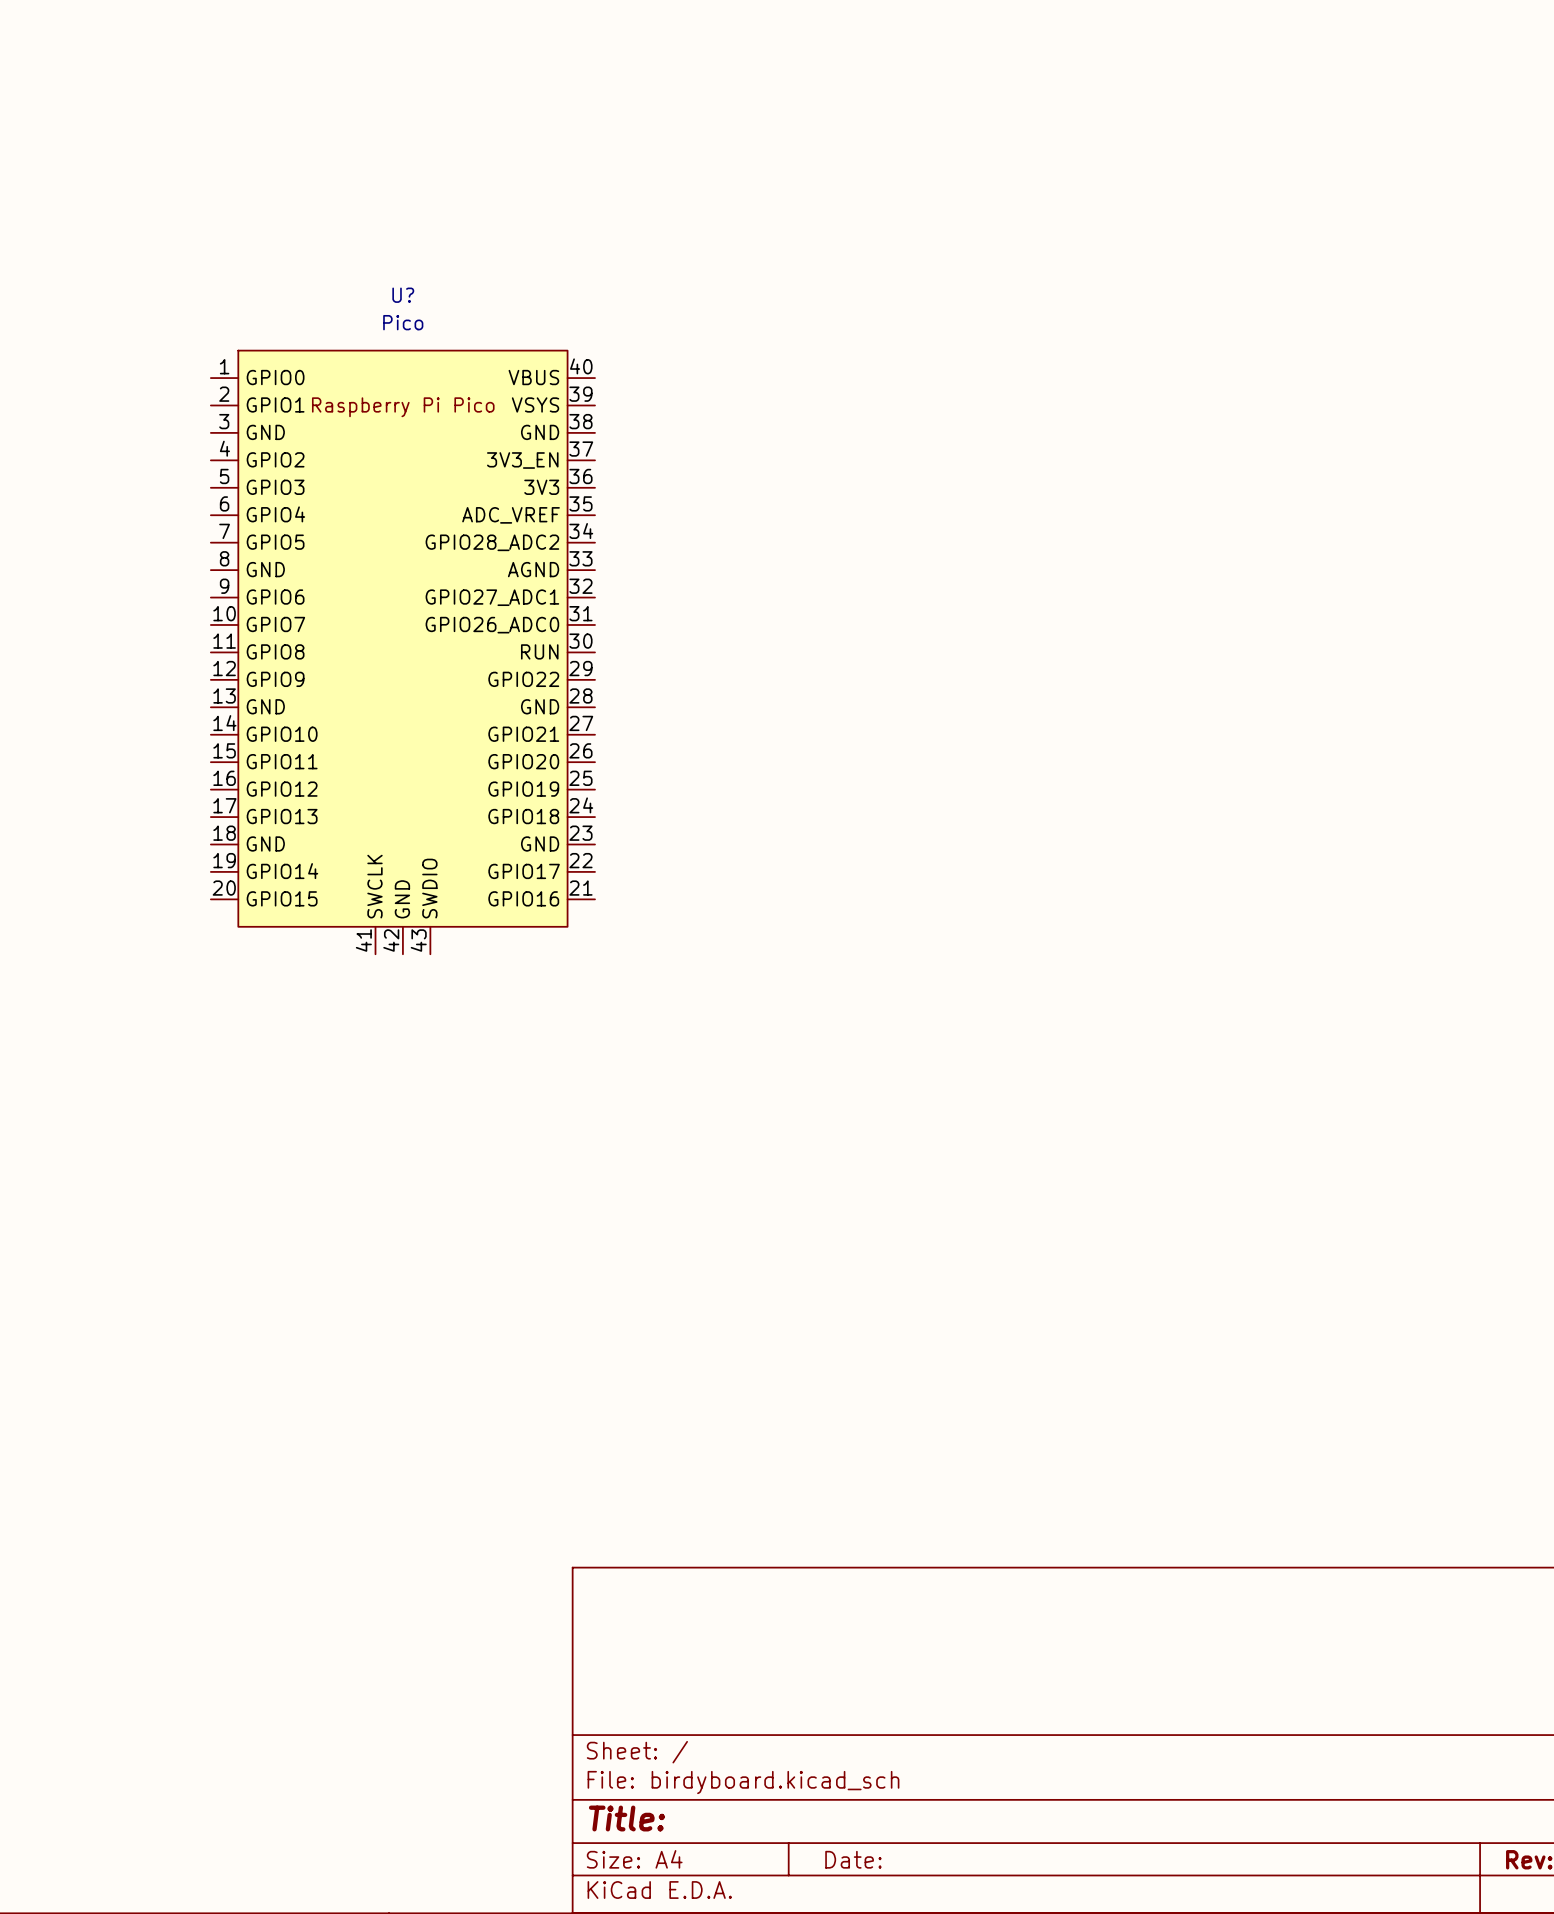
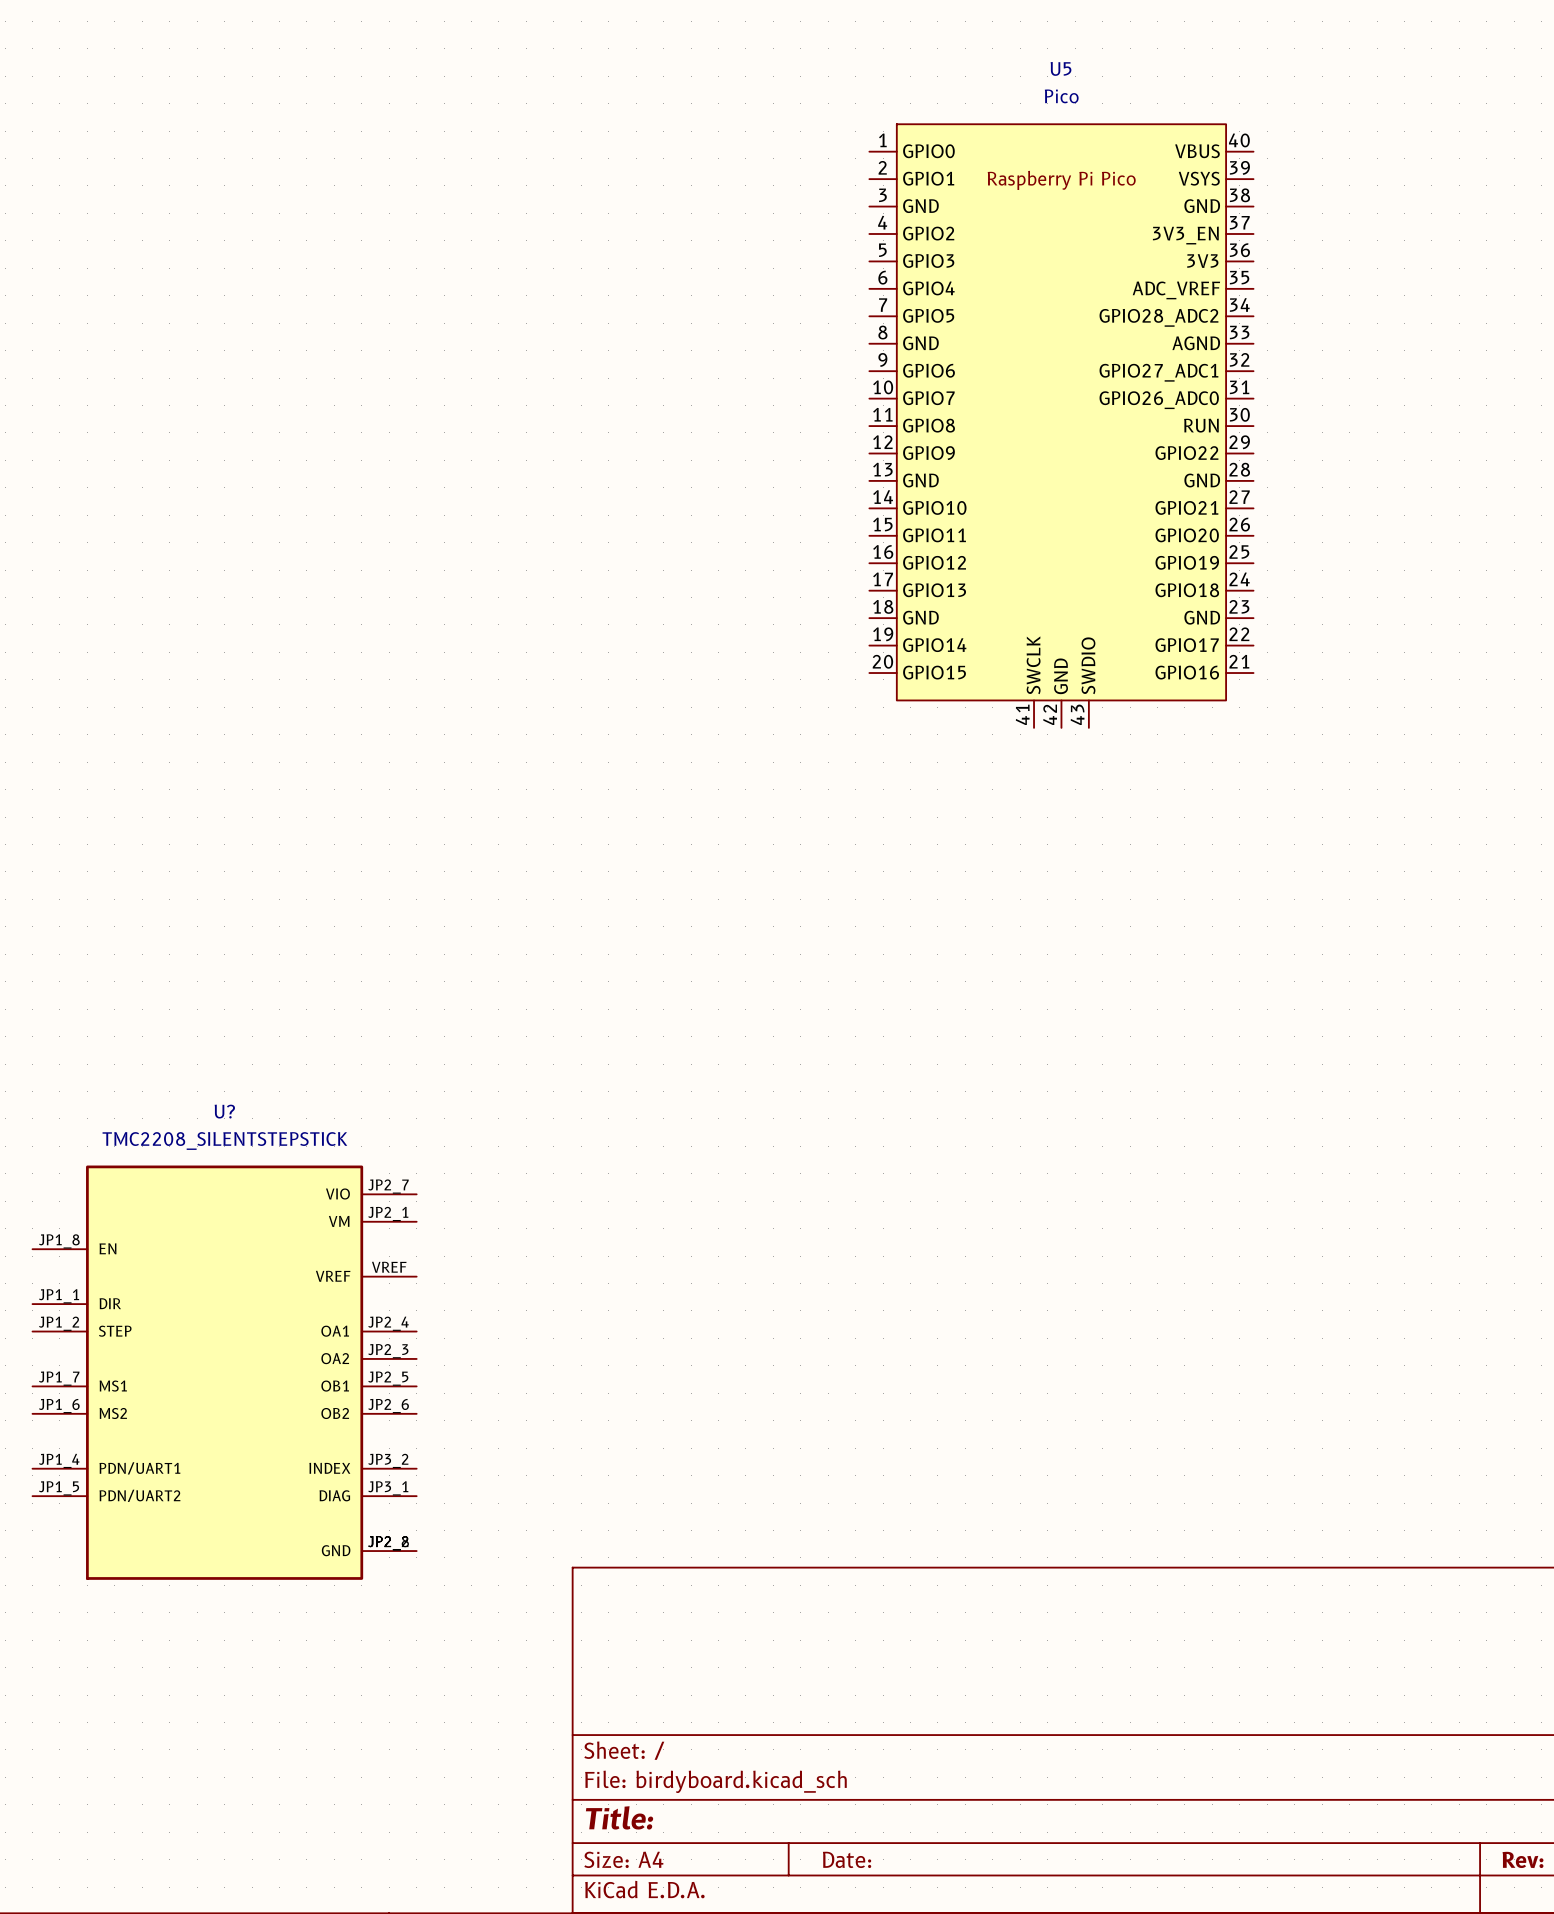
U5: none -> Pico (1061, 426)
U?: Pico (402, 652) -> none
U?: none -> TMC2208_SILENTSTEPSTICK (224, 1372)

